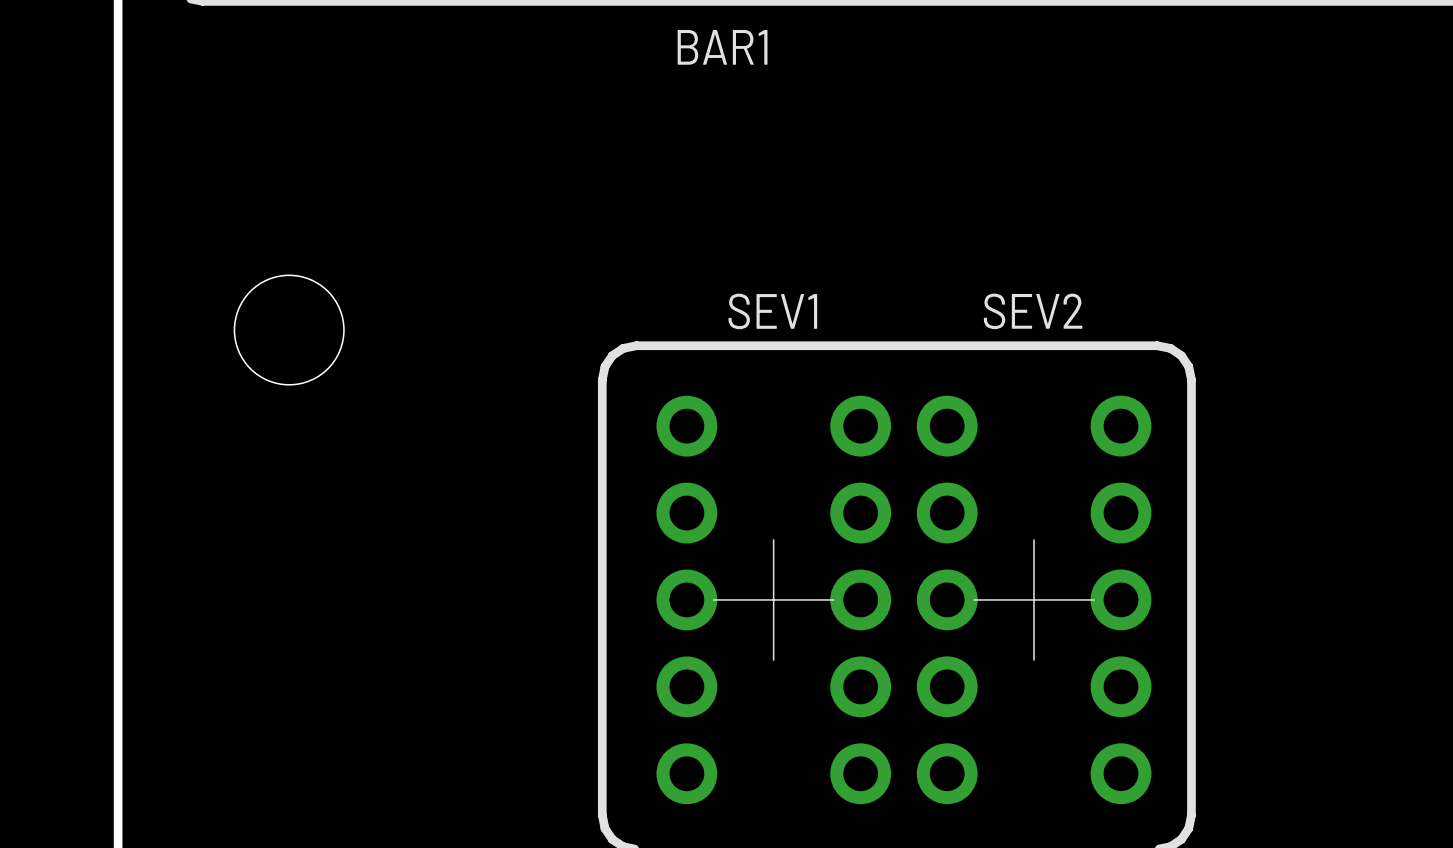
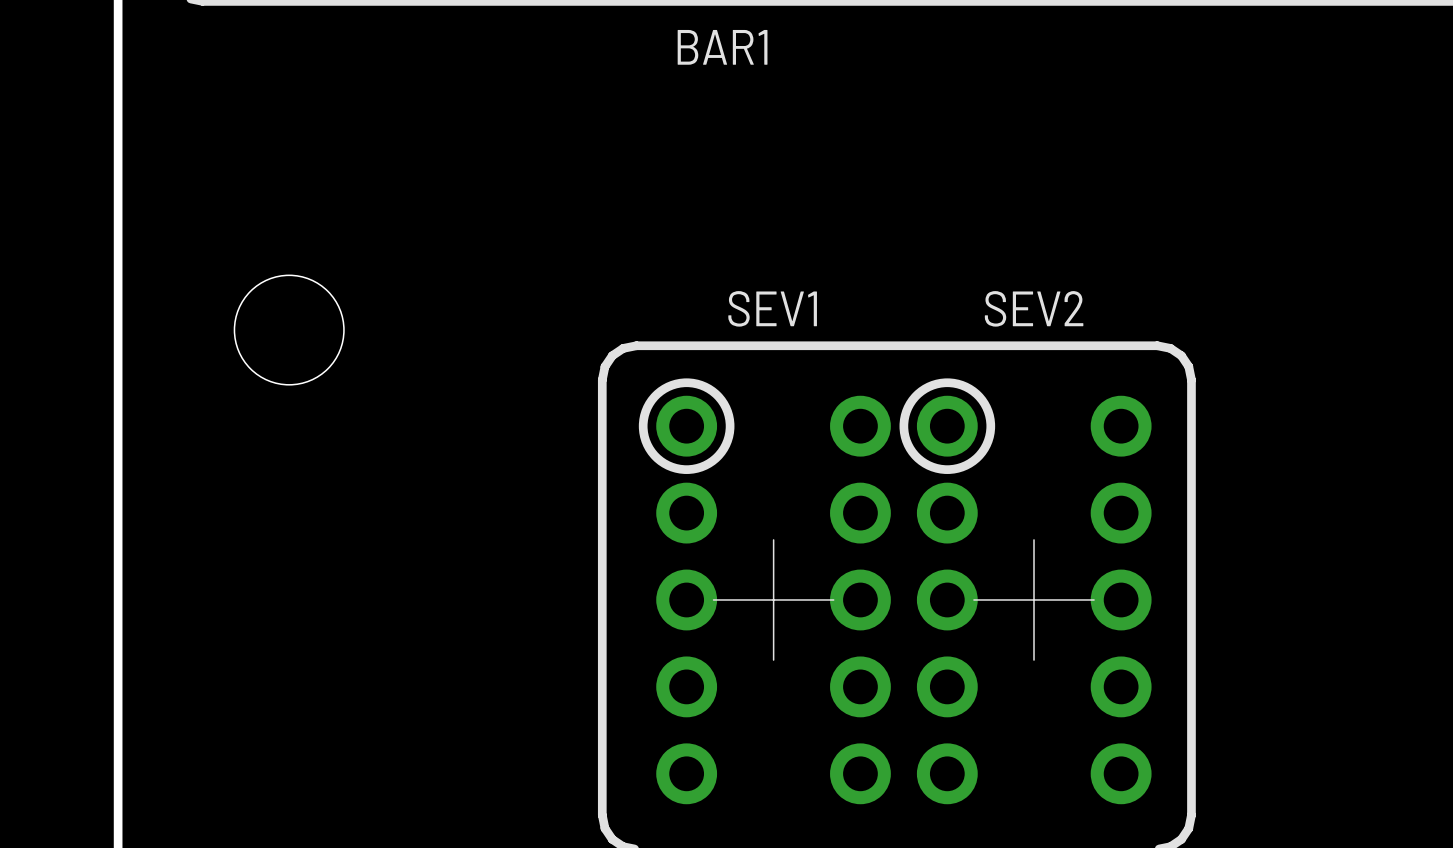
SEV1 footprint: [656, 395, 892, 805] -> [638, 378, 891, 805]
SEV2 footprint: [916, 395, 1152, 805] -> [899, 378, 1152, 805]

